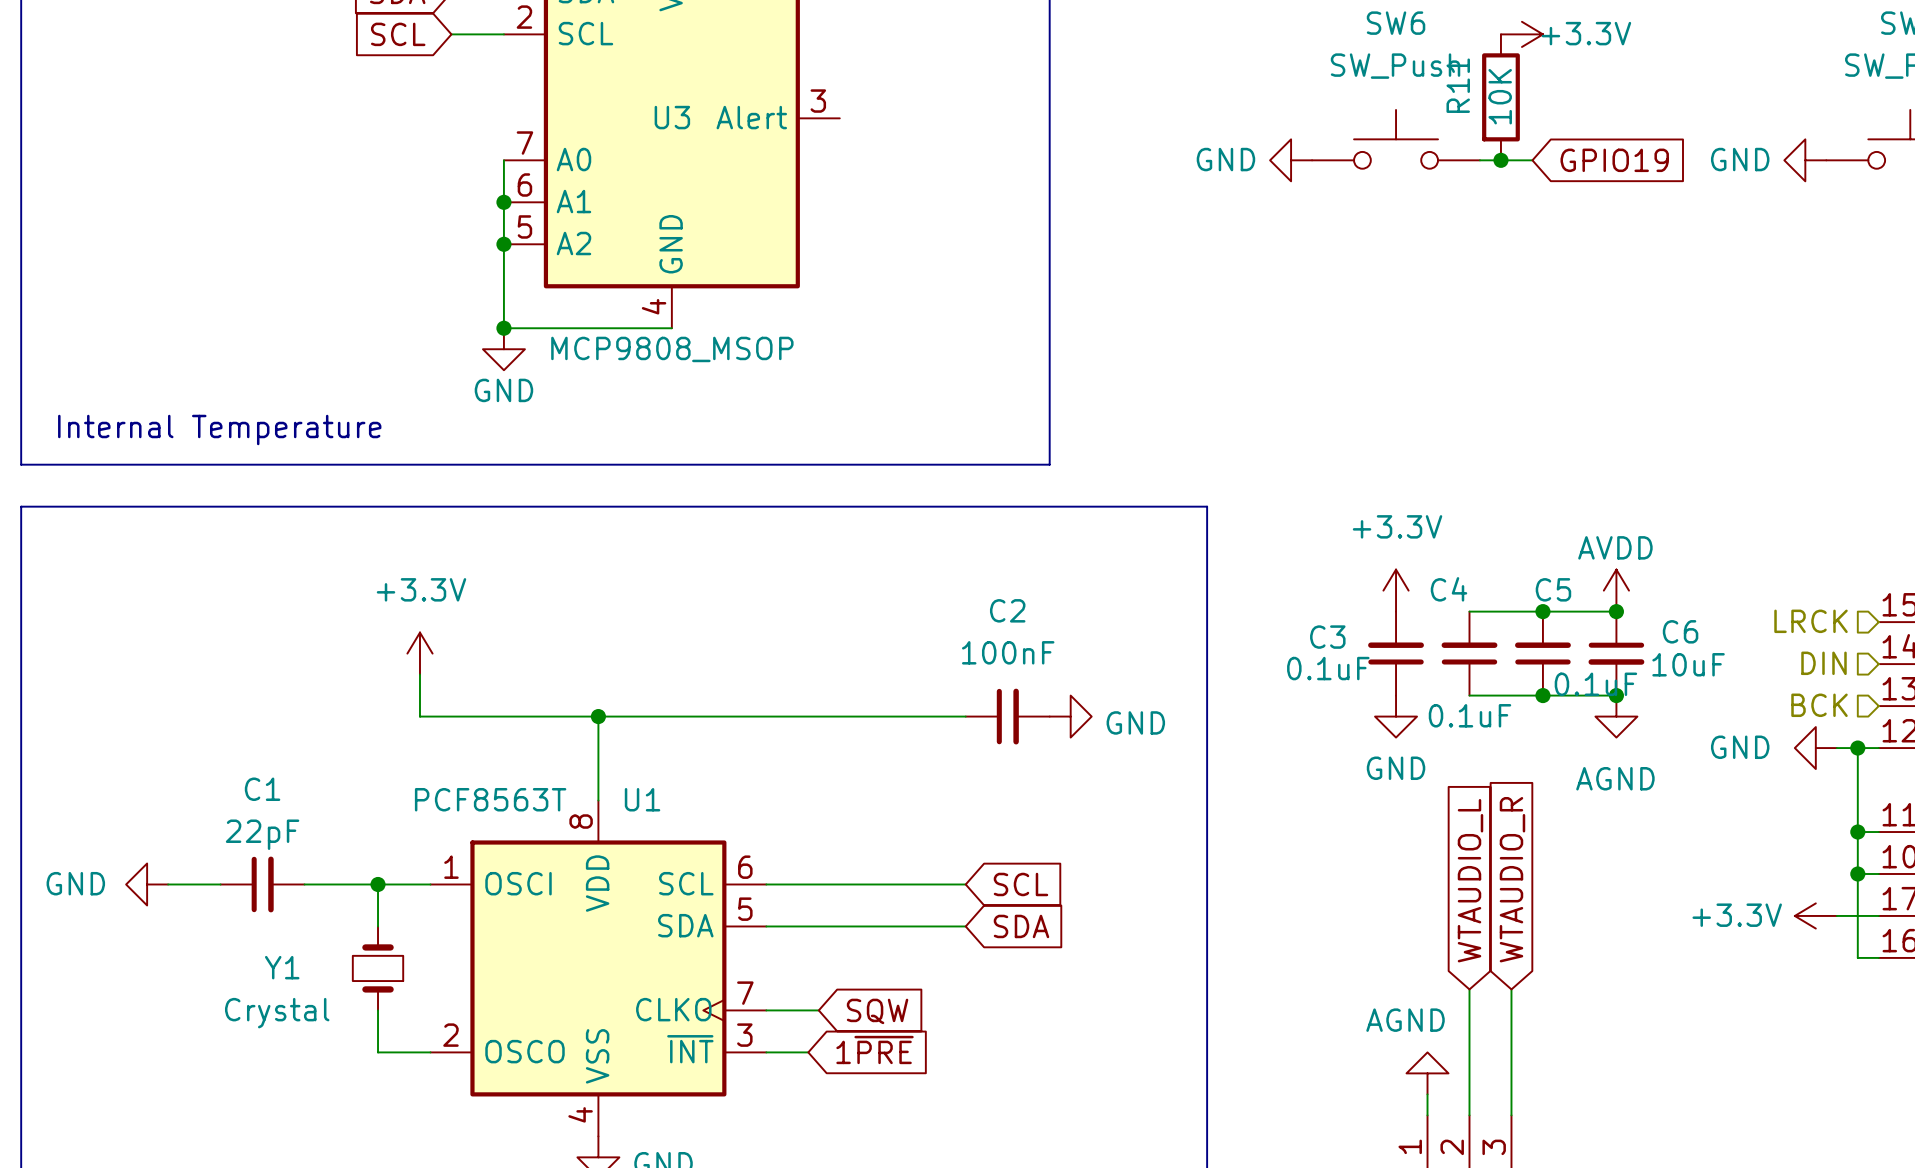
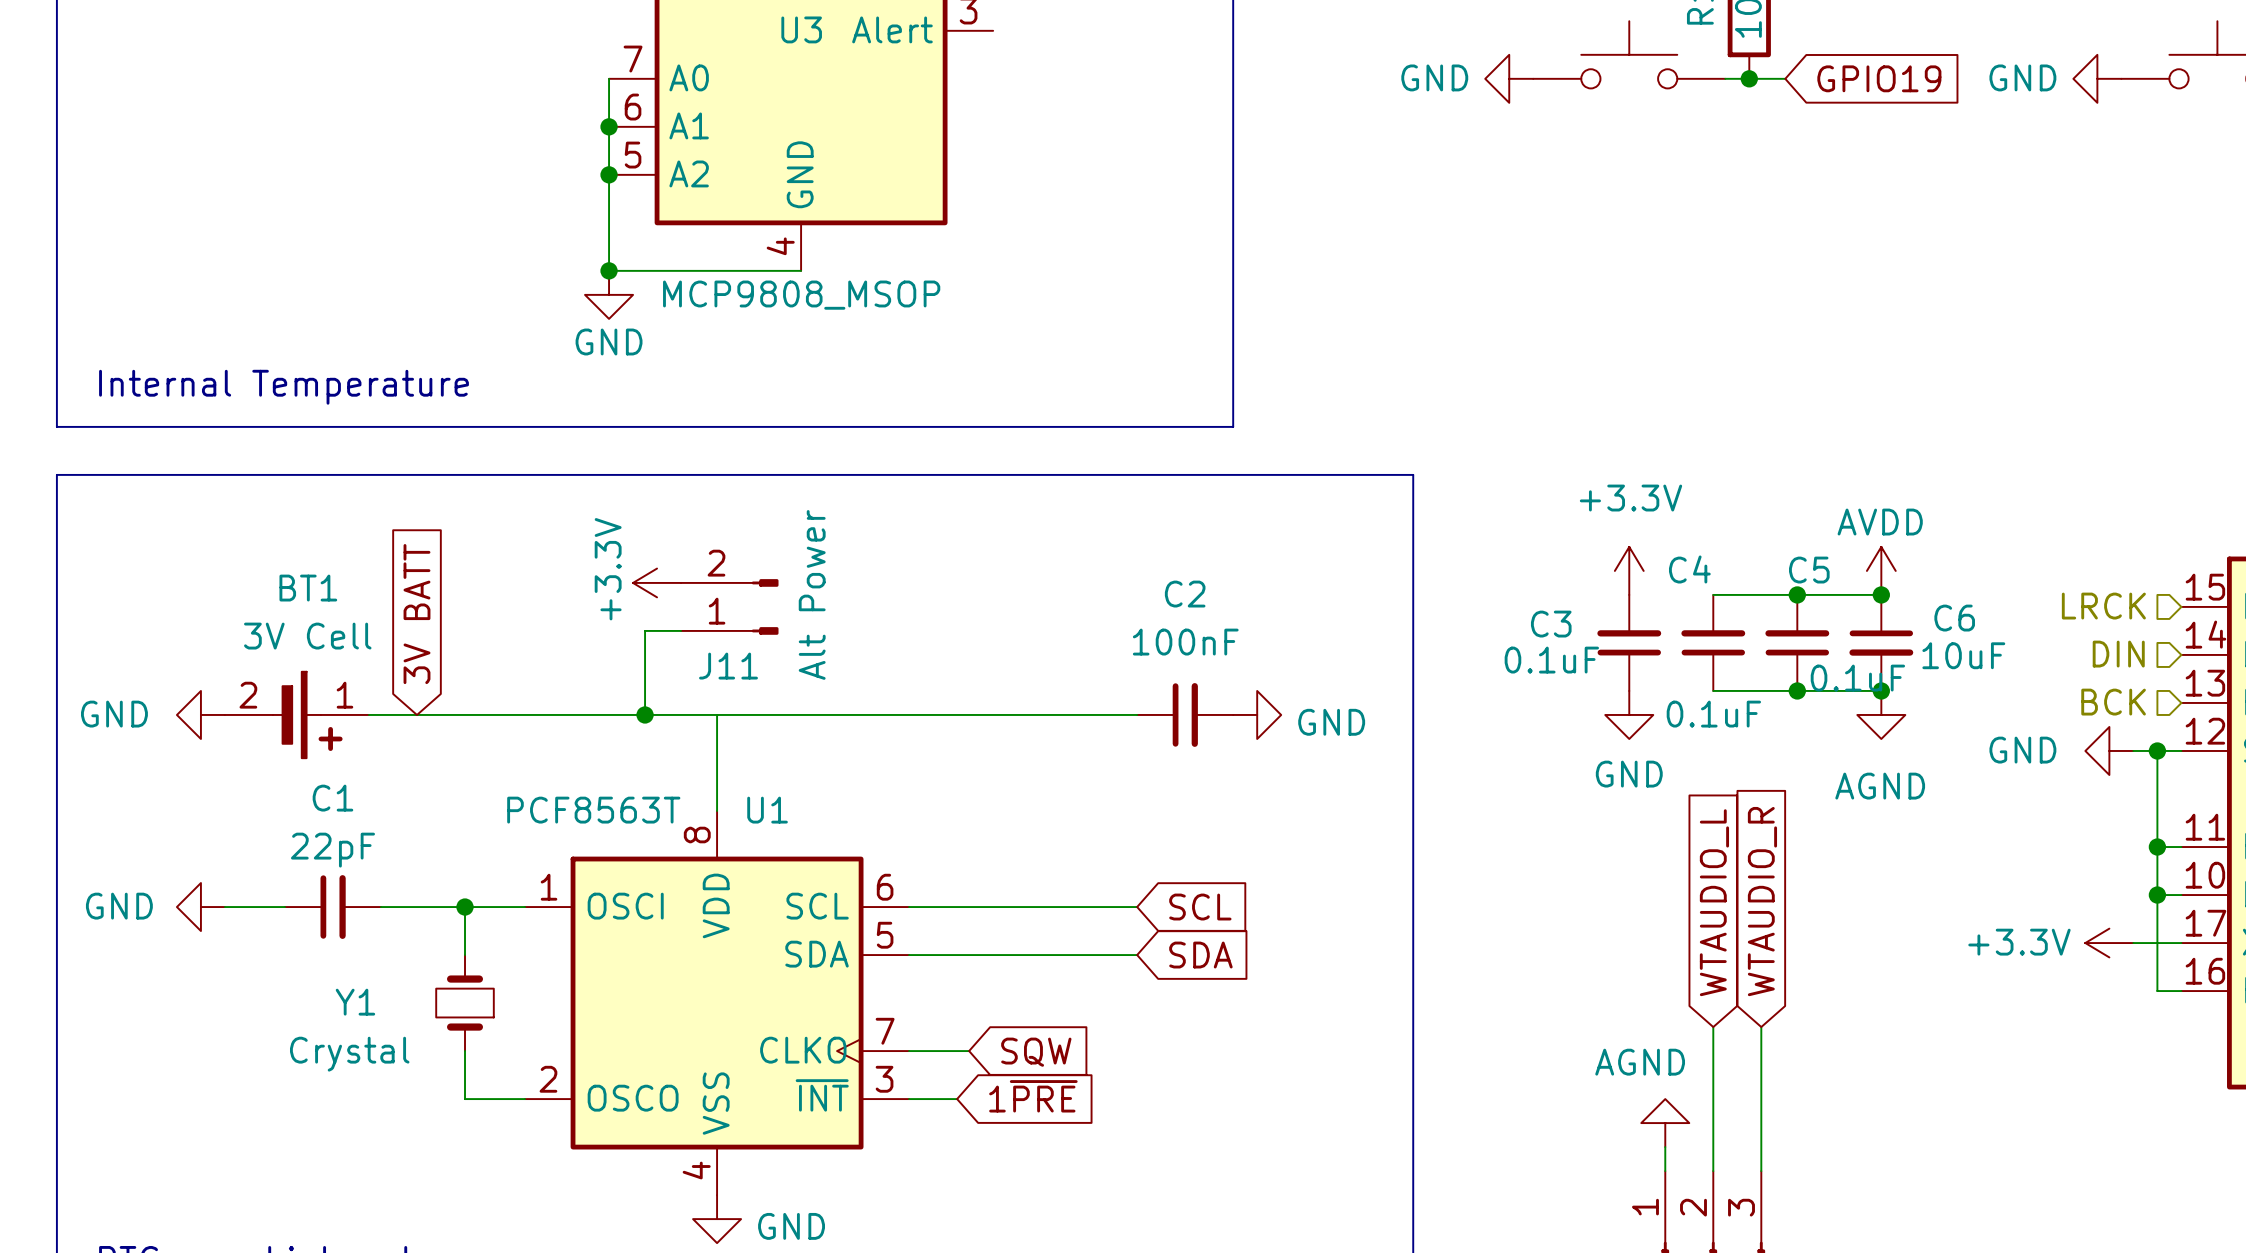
J11: none -> Alt Power (729, 606)
global label: none -> 3V BATT (416, 614)
wire: none -> (681, 630) (645, 630) (645, 714)
power symbol rotation: 0° (419, 653) -> 90° counterclockwise (657, 582)
power symbol position: +3.3V (419, 653) -> +3.3V (657, 582)
wire: (419, 674) (419, 716) -> (368, 714) (513, 714)
power symbol: none -> GND (200, 714)
BT1: none -> 3V Cell (296, 714)
junction position: (598, 716) -> (645, 714)

